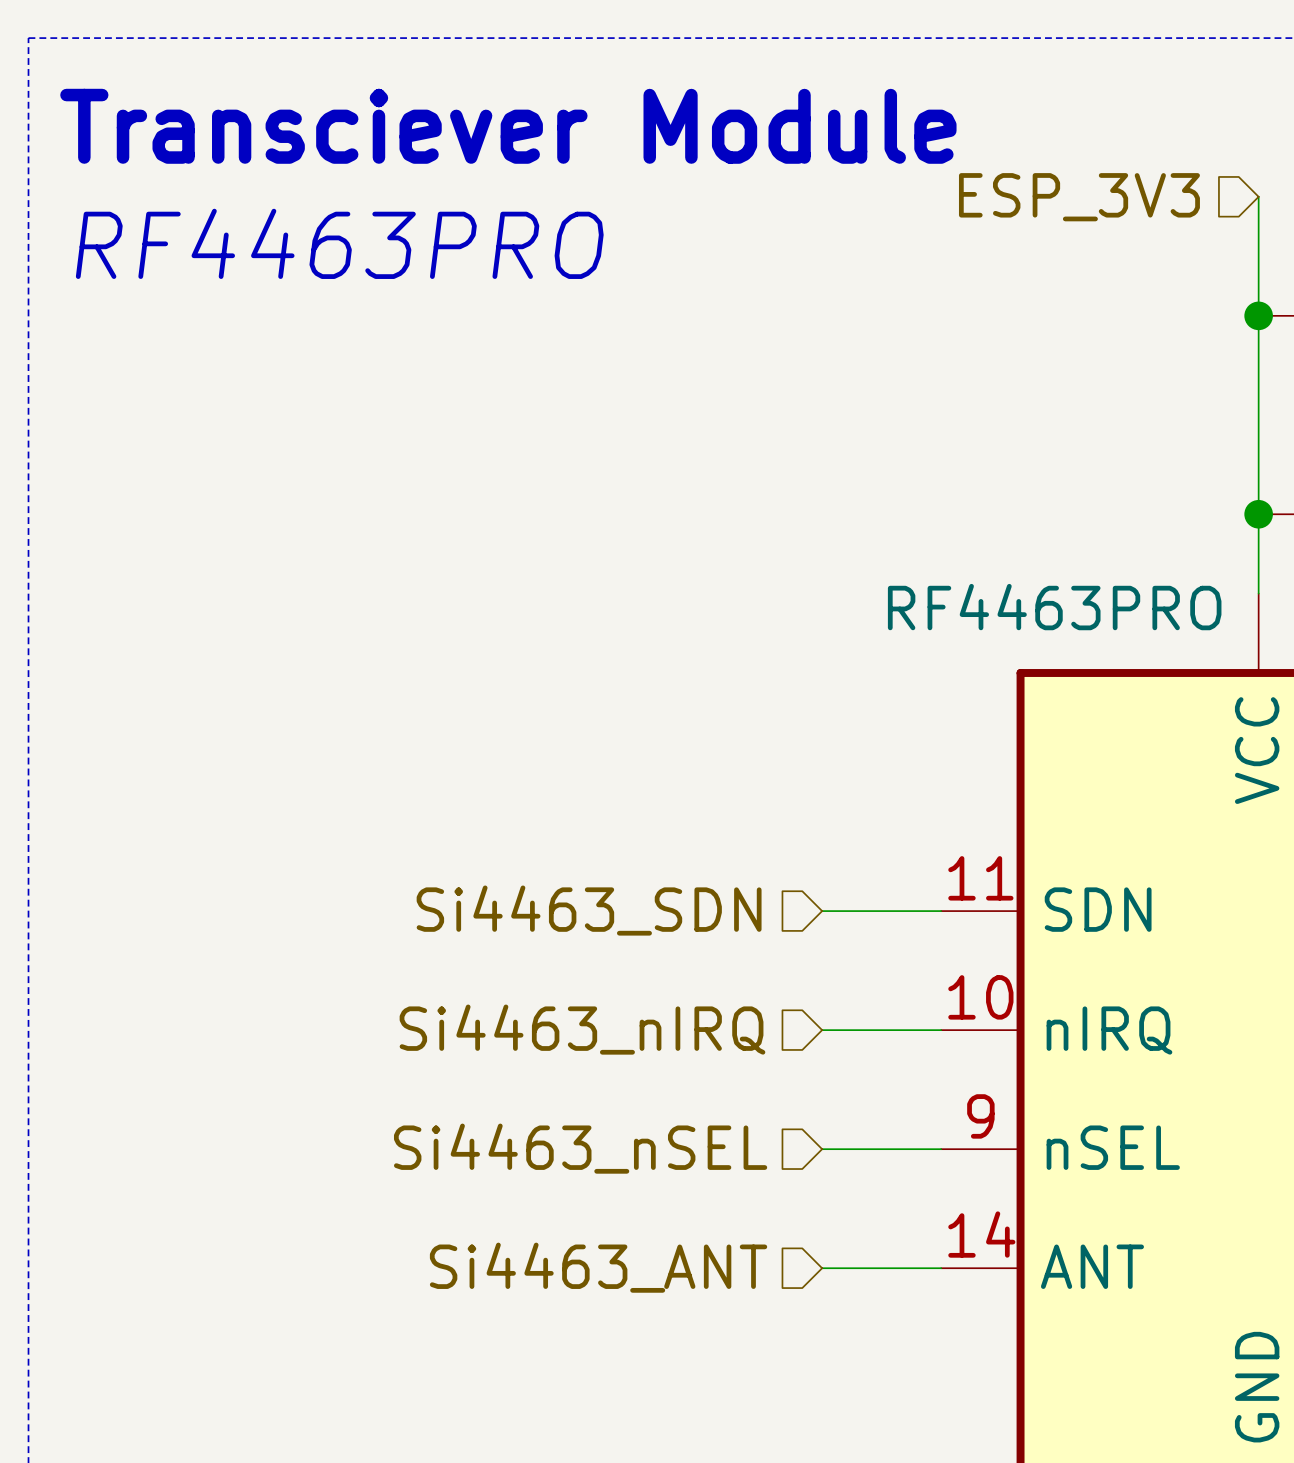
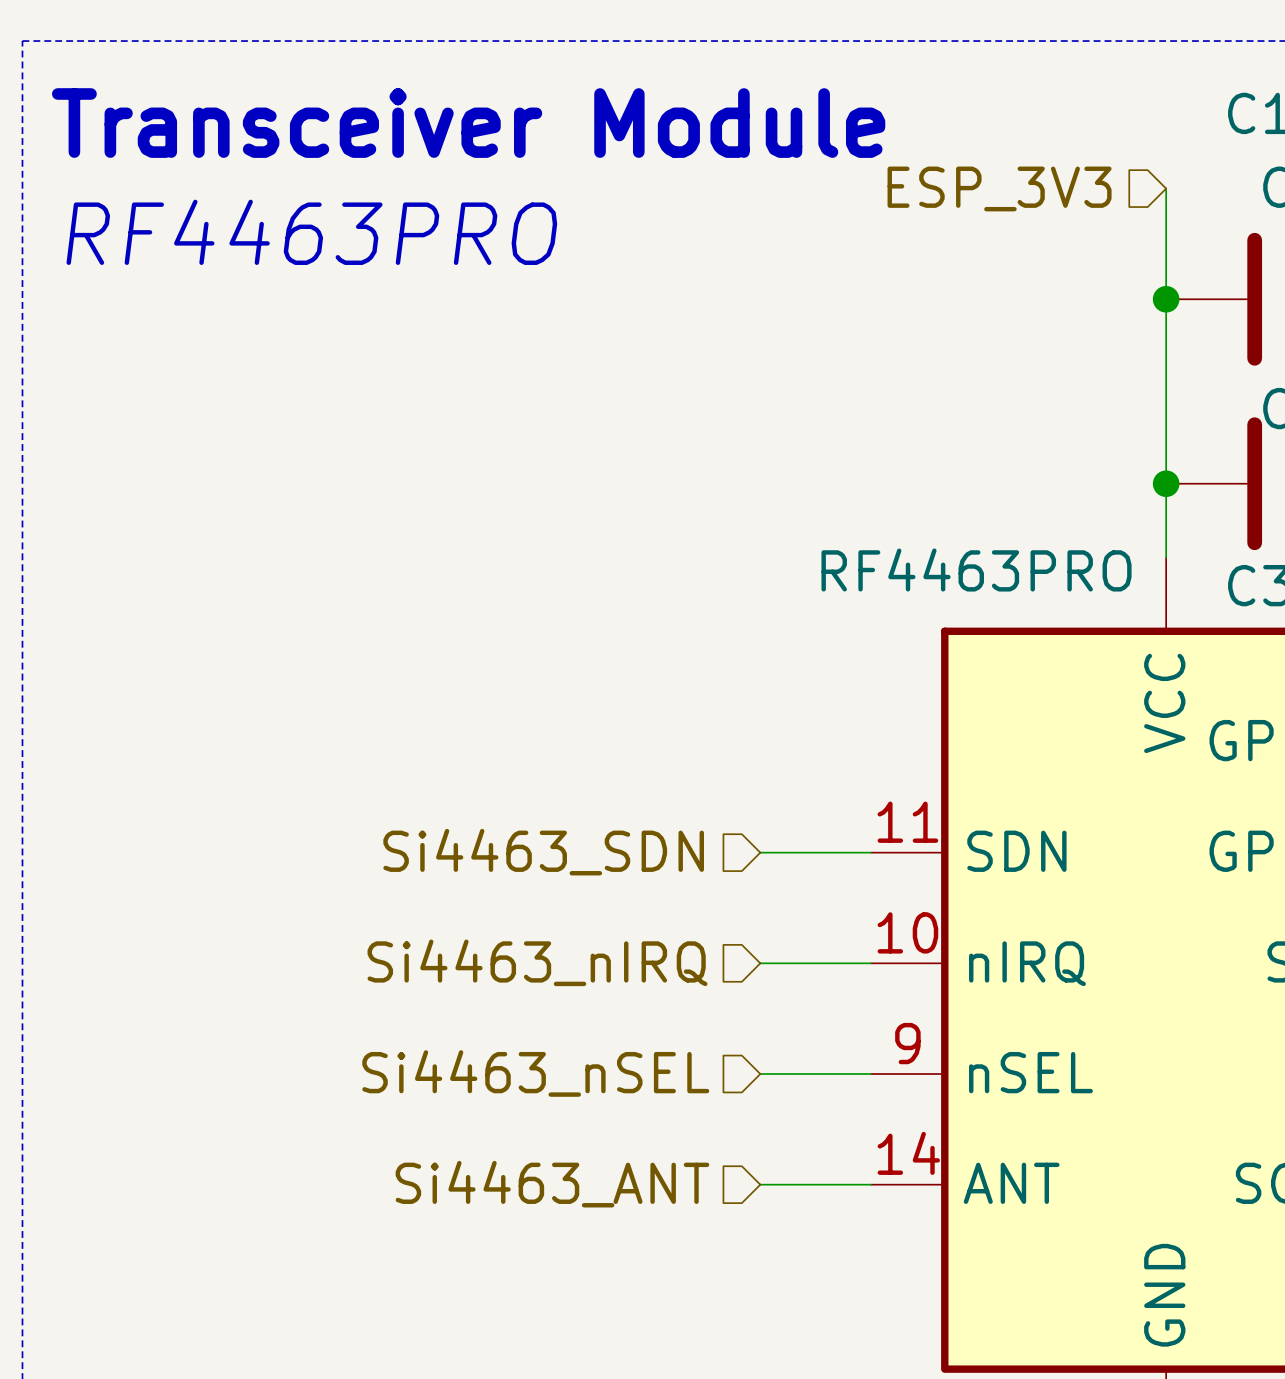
text: Transciever Module (508, 126) -> Transceiver Module (468, 123)

